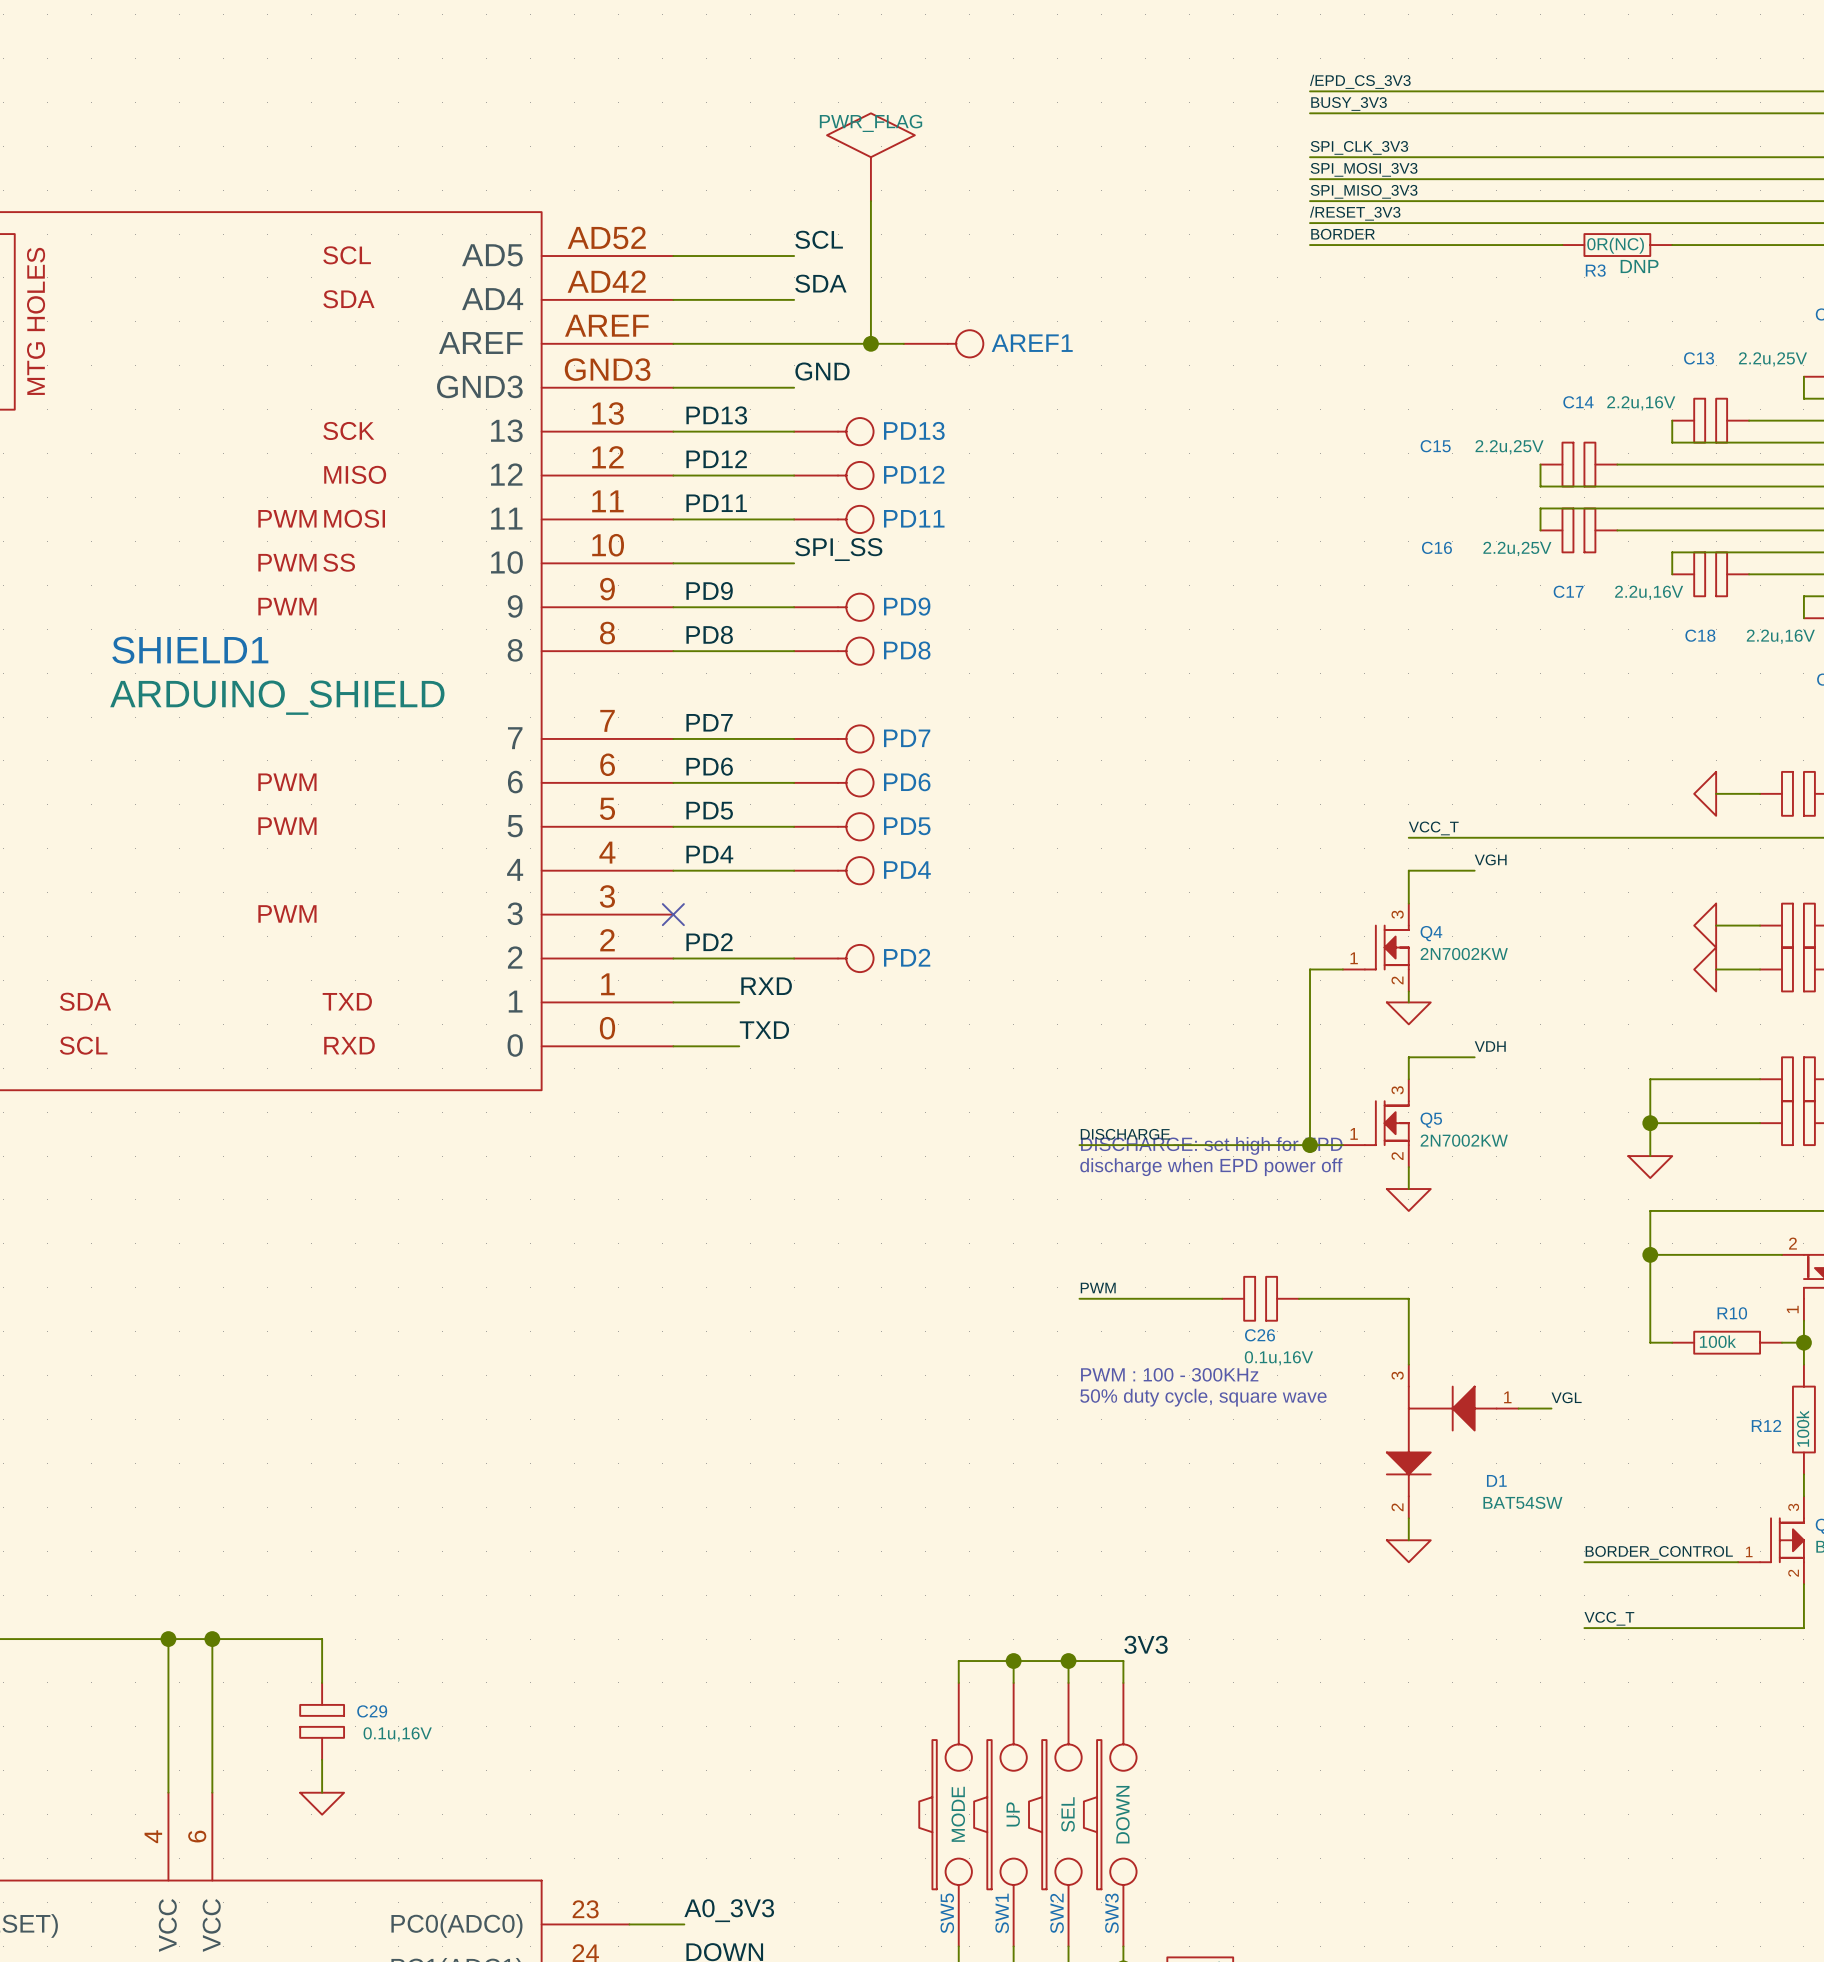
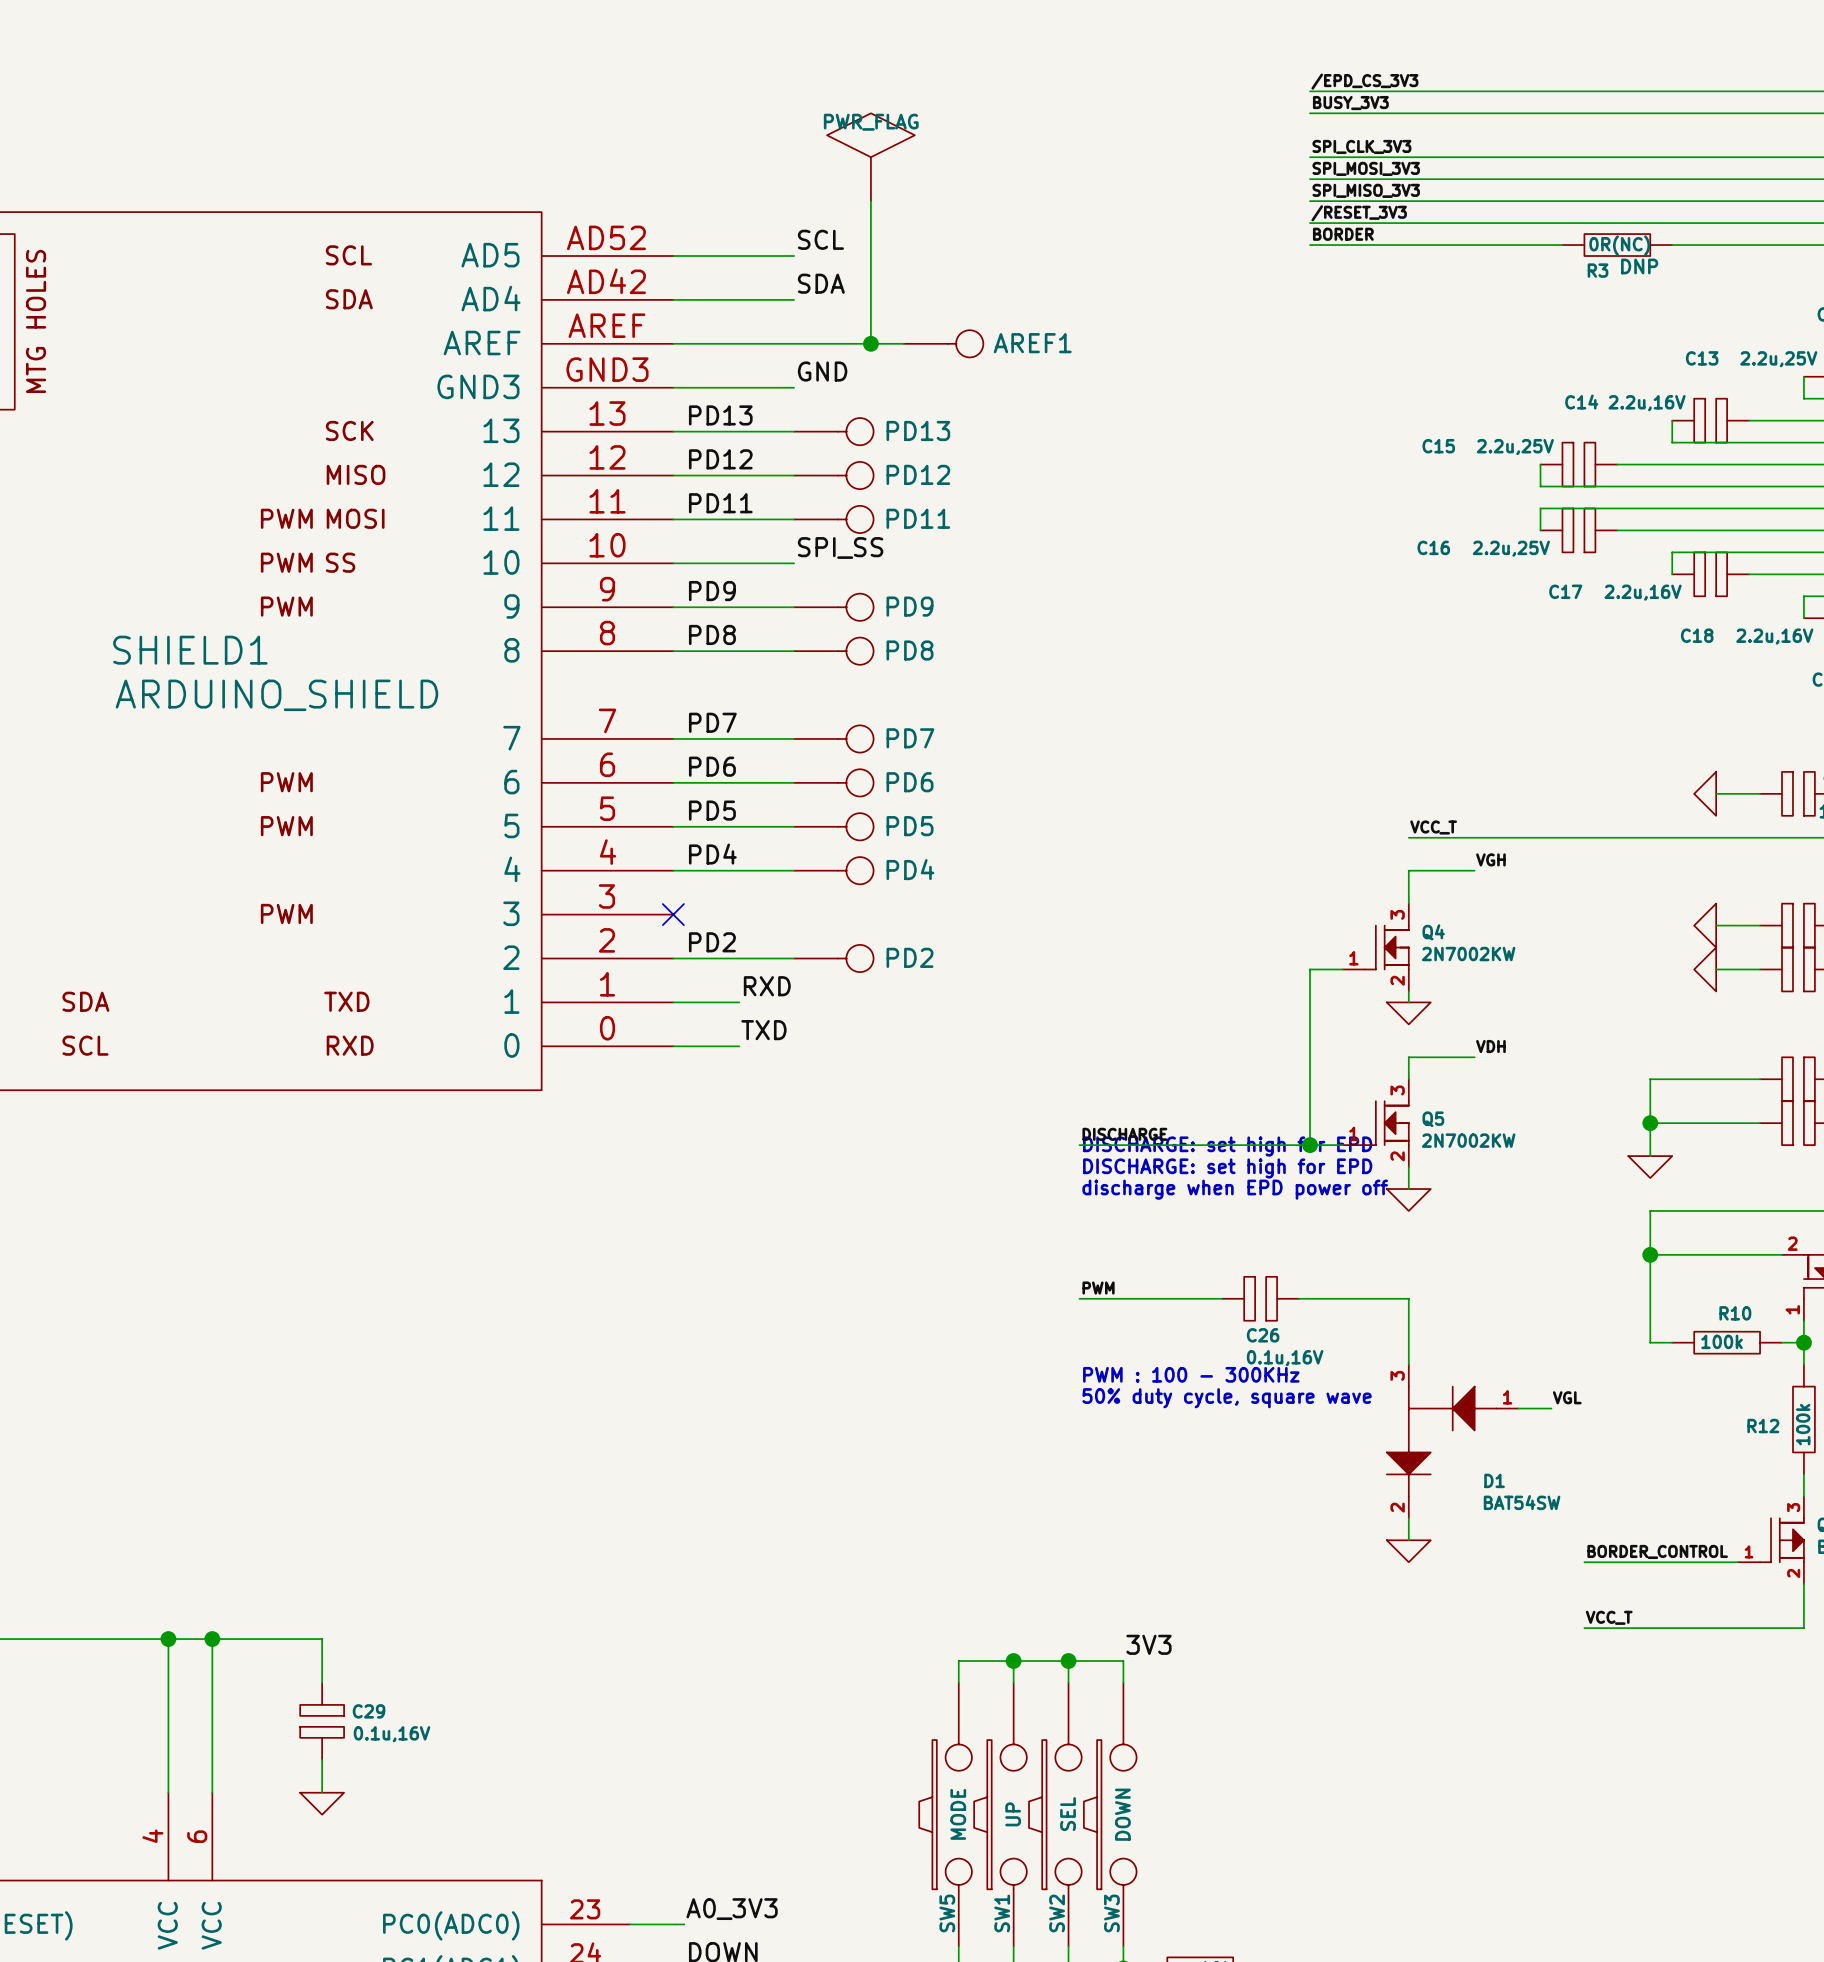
text: discharge when EPD power off (1211, 1167) -> DISCHARGE: set high for EPD (1227, 1168)
text: none -> discharge when EPD power off (1235, 1189)

